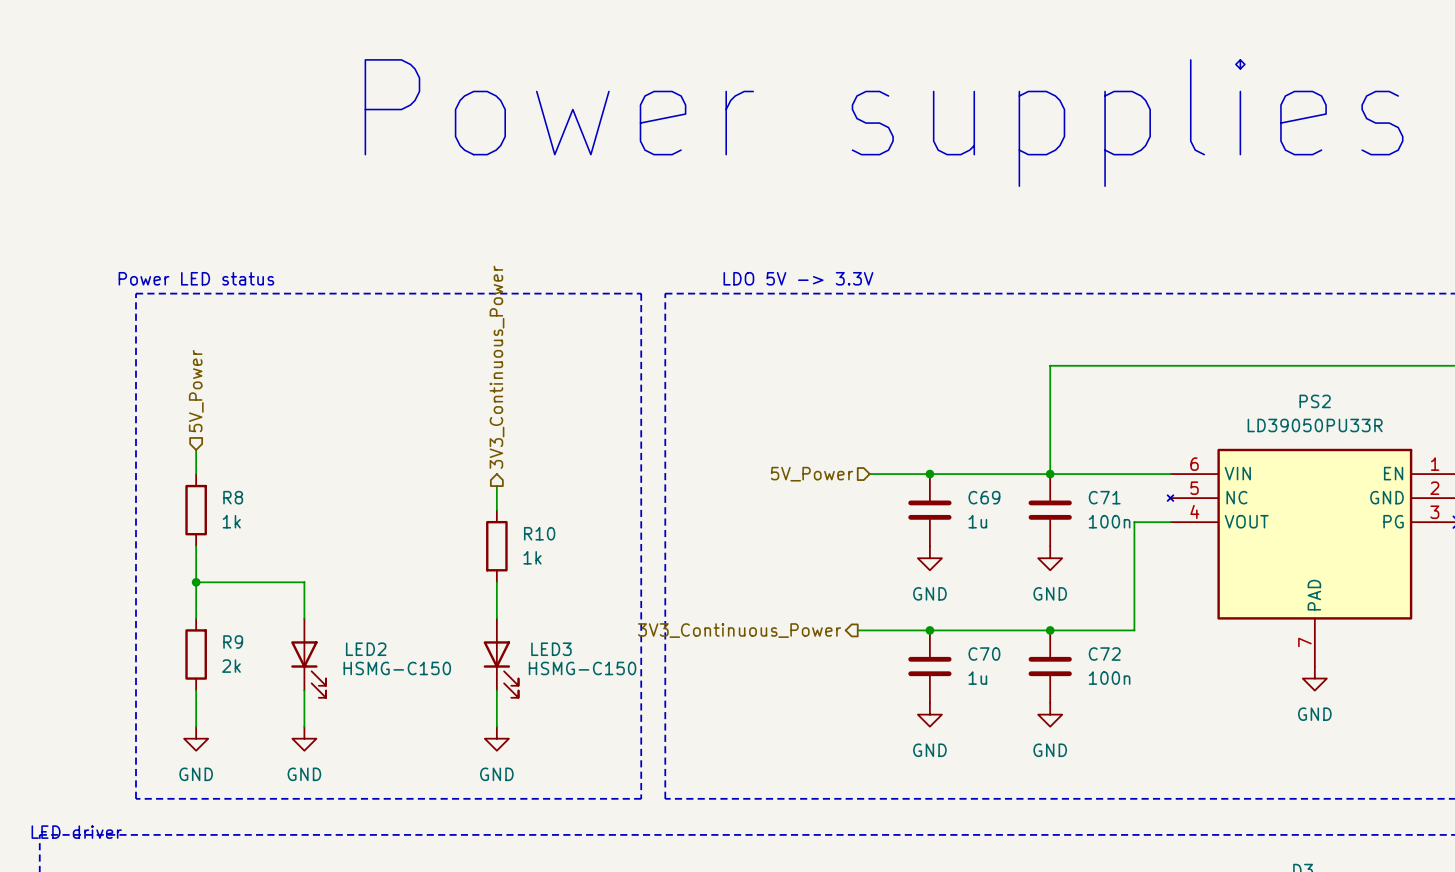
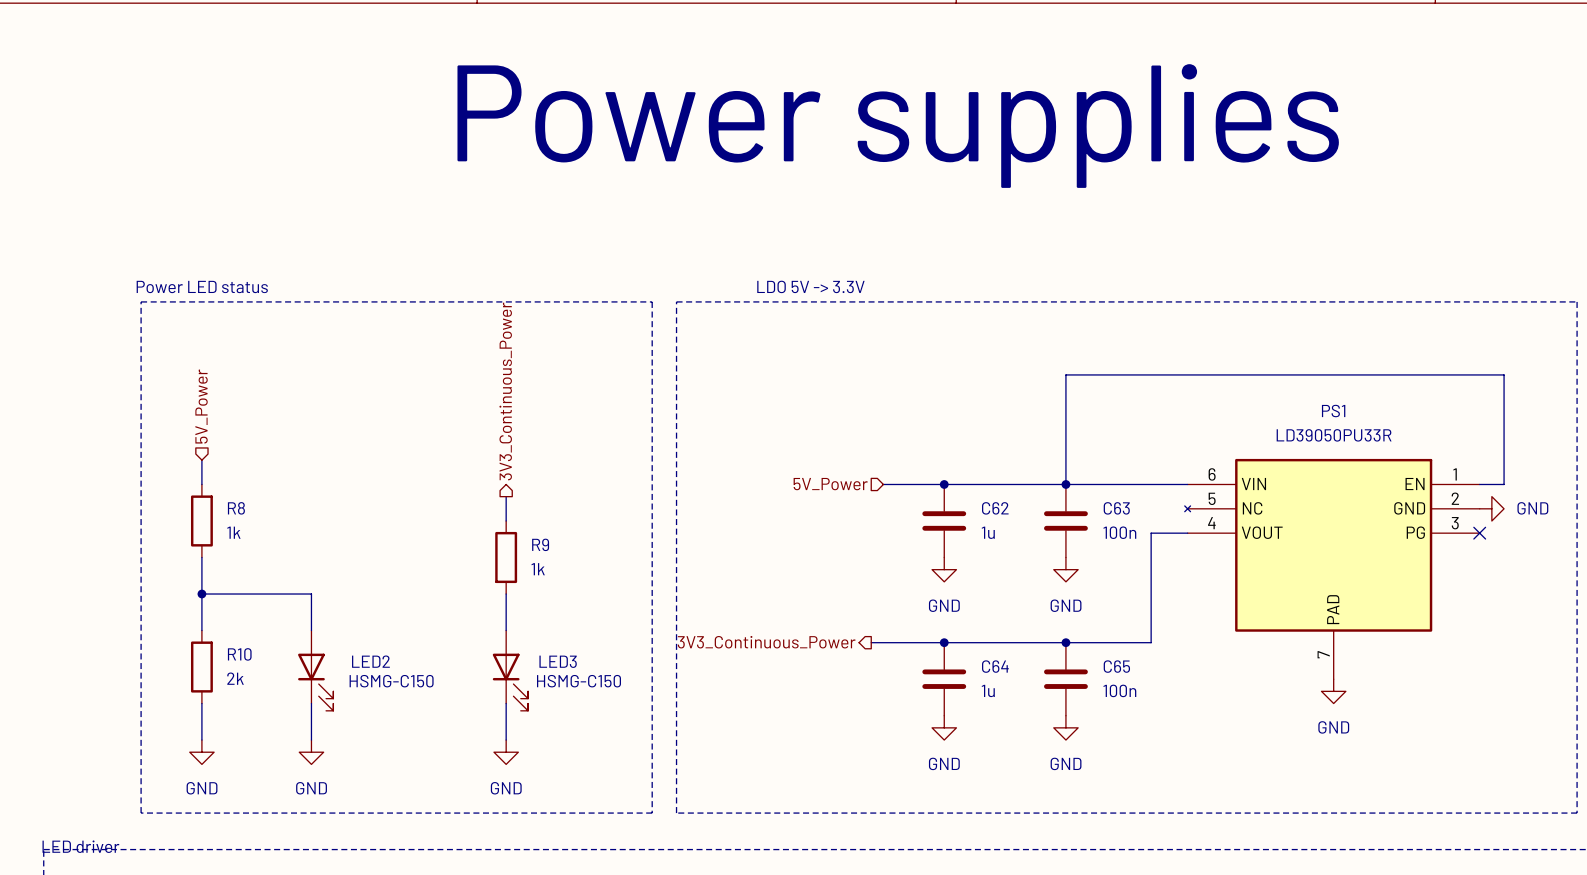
PS2 name: PS2 (1315, 401) -> PS1 (1333, 411)
C69 name: C69 (984, 497) -> C62 (995, 508)
C71 name: C71 (1104, 497) -> C63 (1116, 508)
R10 name: R10 (539, 533) -> R9 (540, 544)
R9 name: R9 (233, 642) -> R10 (239, 654)
C70 name: C70 (984, 654) -> C64 (995, 666)
C72 name: C72 (1104, 654) -> C65 (1116, 666)

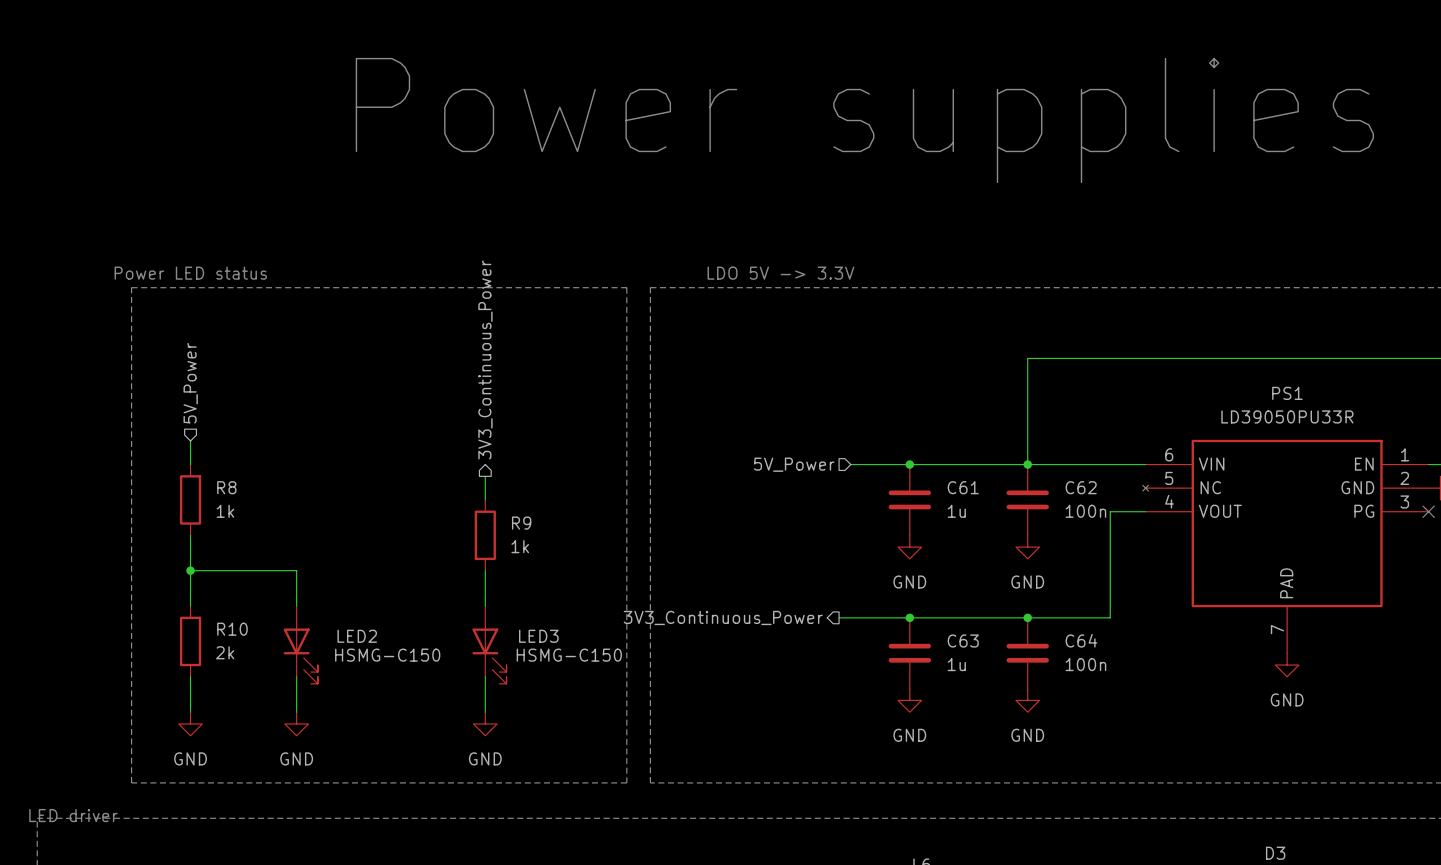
C62 name: C62 (995, 508) -> C61 (963, 487)
C63 name: C63 (1116, 508) -> C62 (1081, 487)
C64 name: C64 (995, 666) -> C63 (963, 640)
C65 name: C65 (1116, 666) -> C64 (1081, 640)

